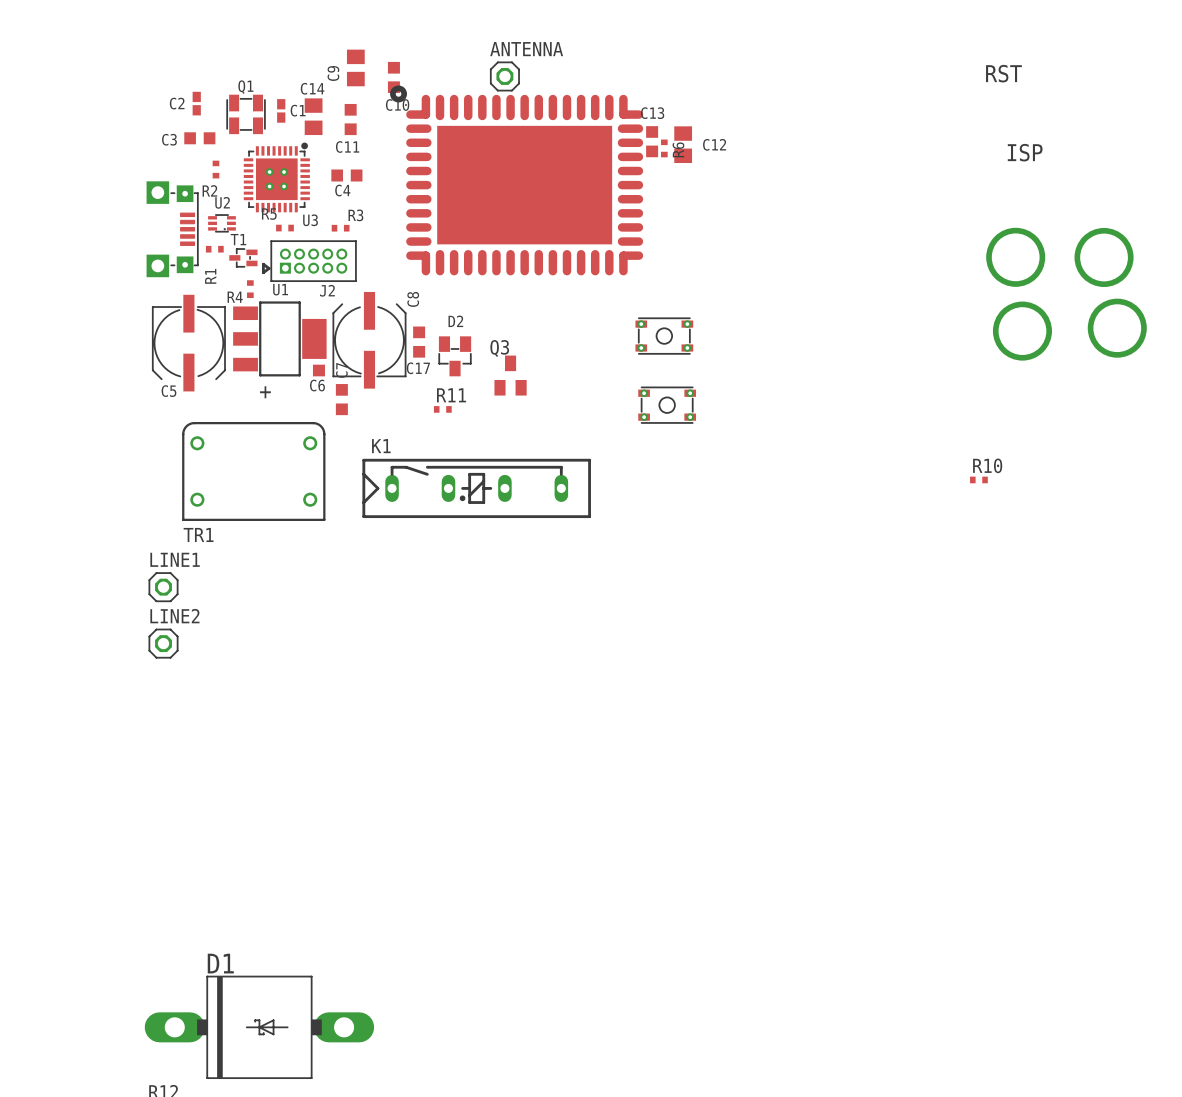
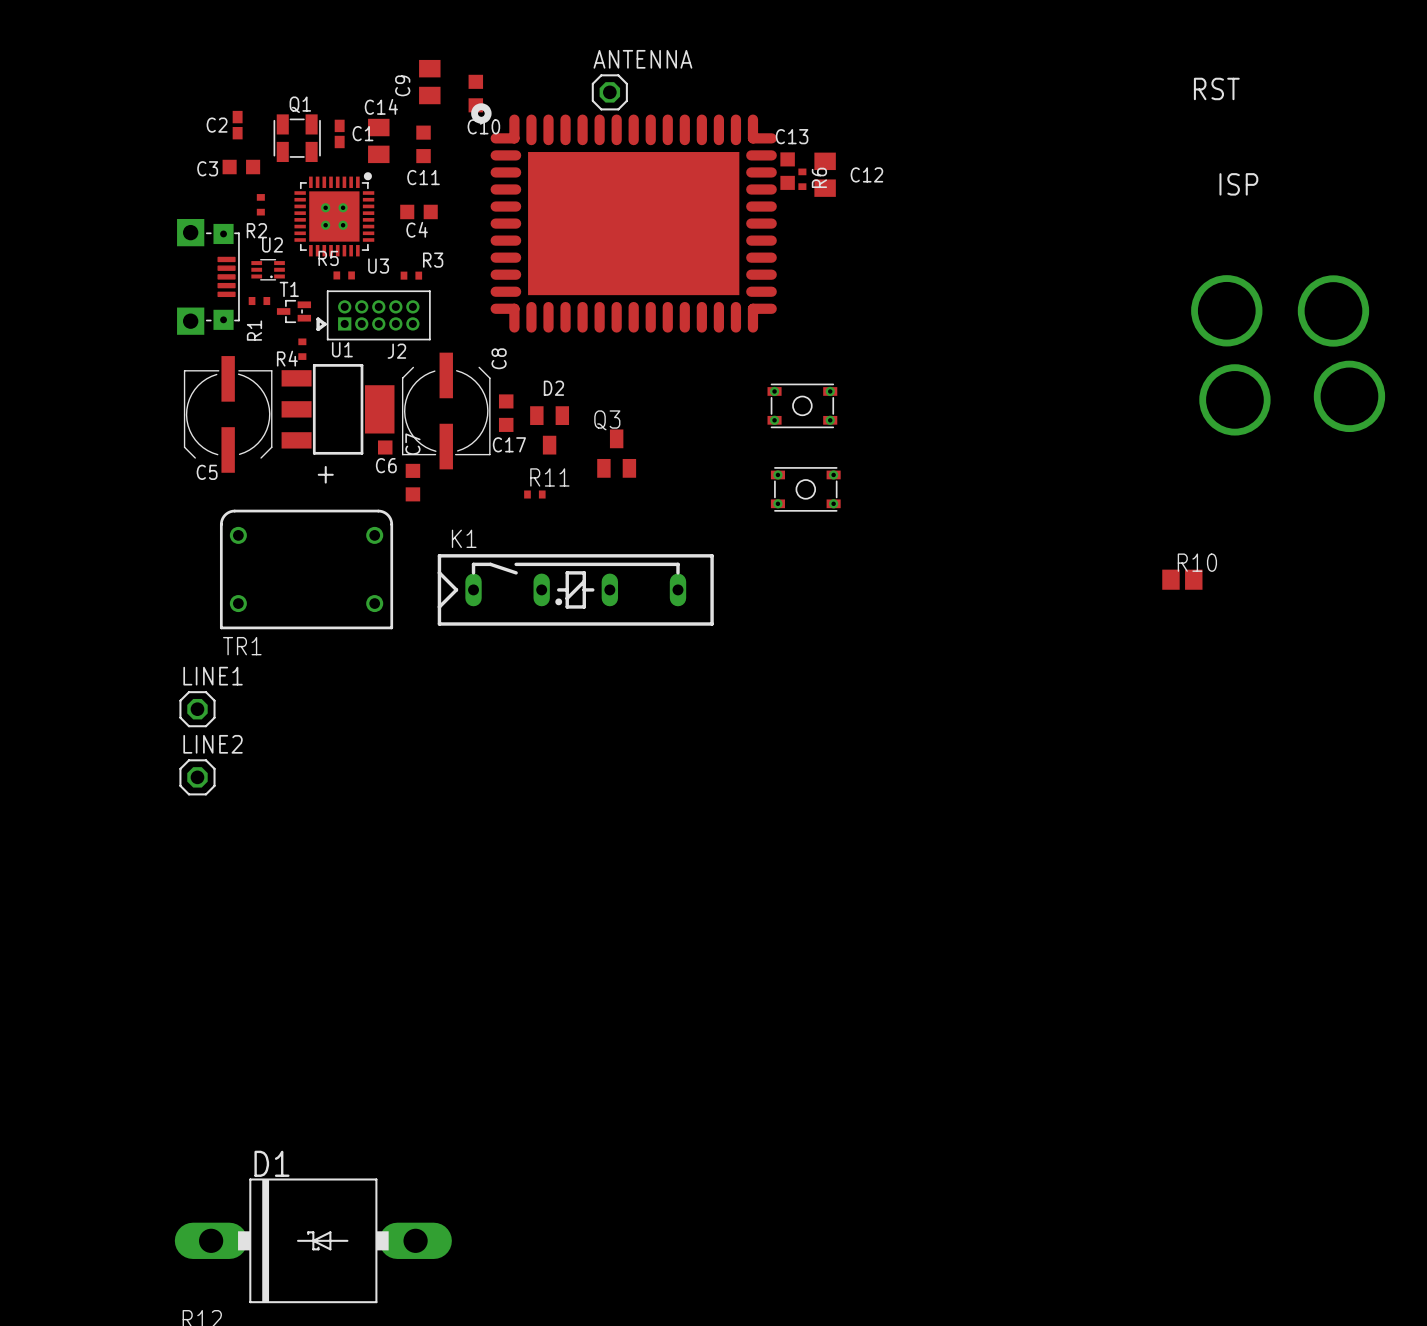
D2 footprint: [438, 336, 472, 377] -> [530, 406, 570, 455]
R10 footprint: [970, 476, 988, 484] -> [1162, 569, 1203, 590]

